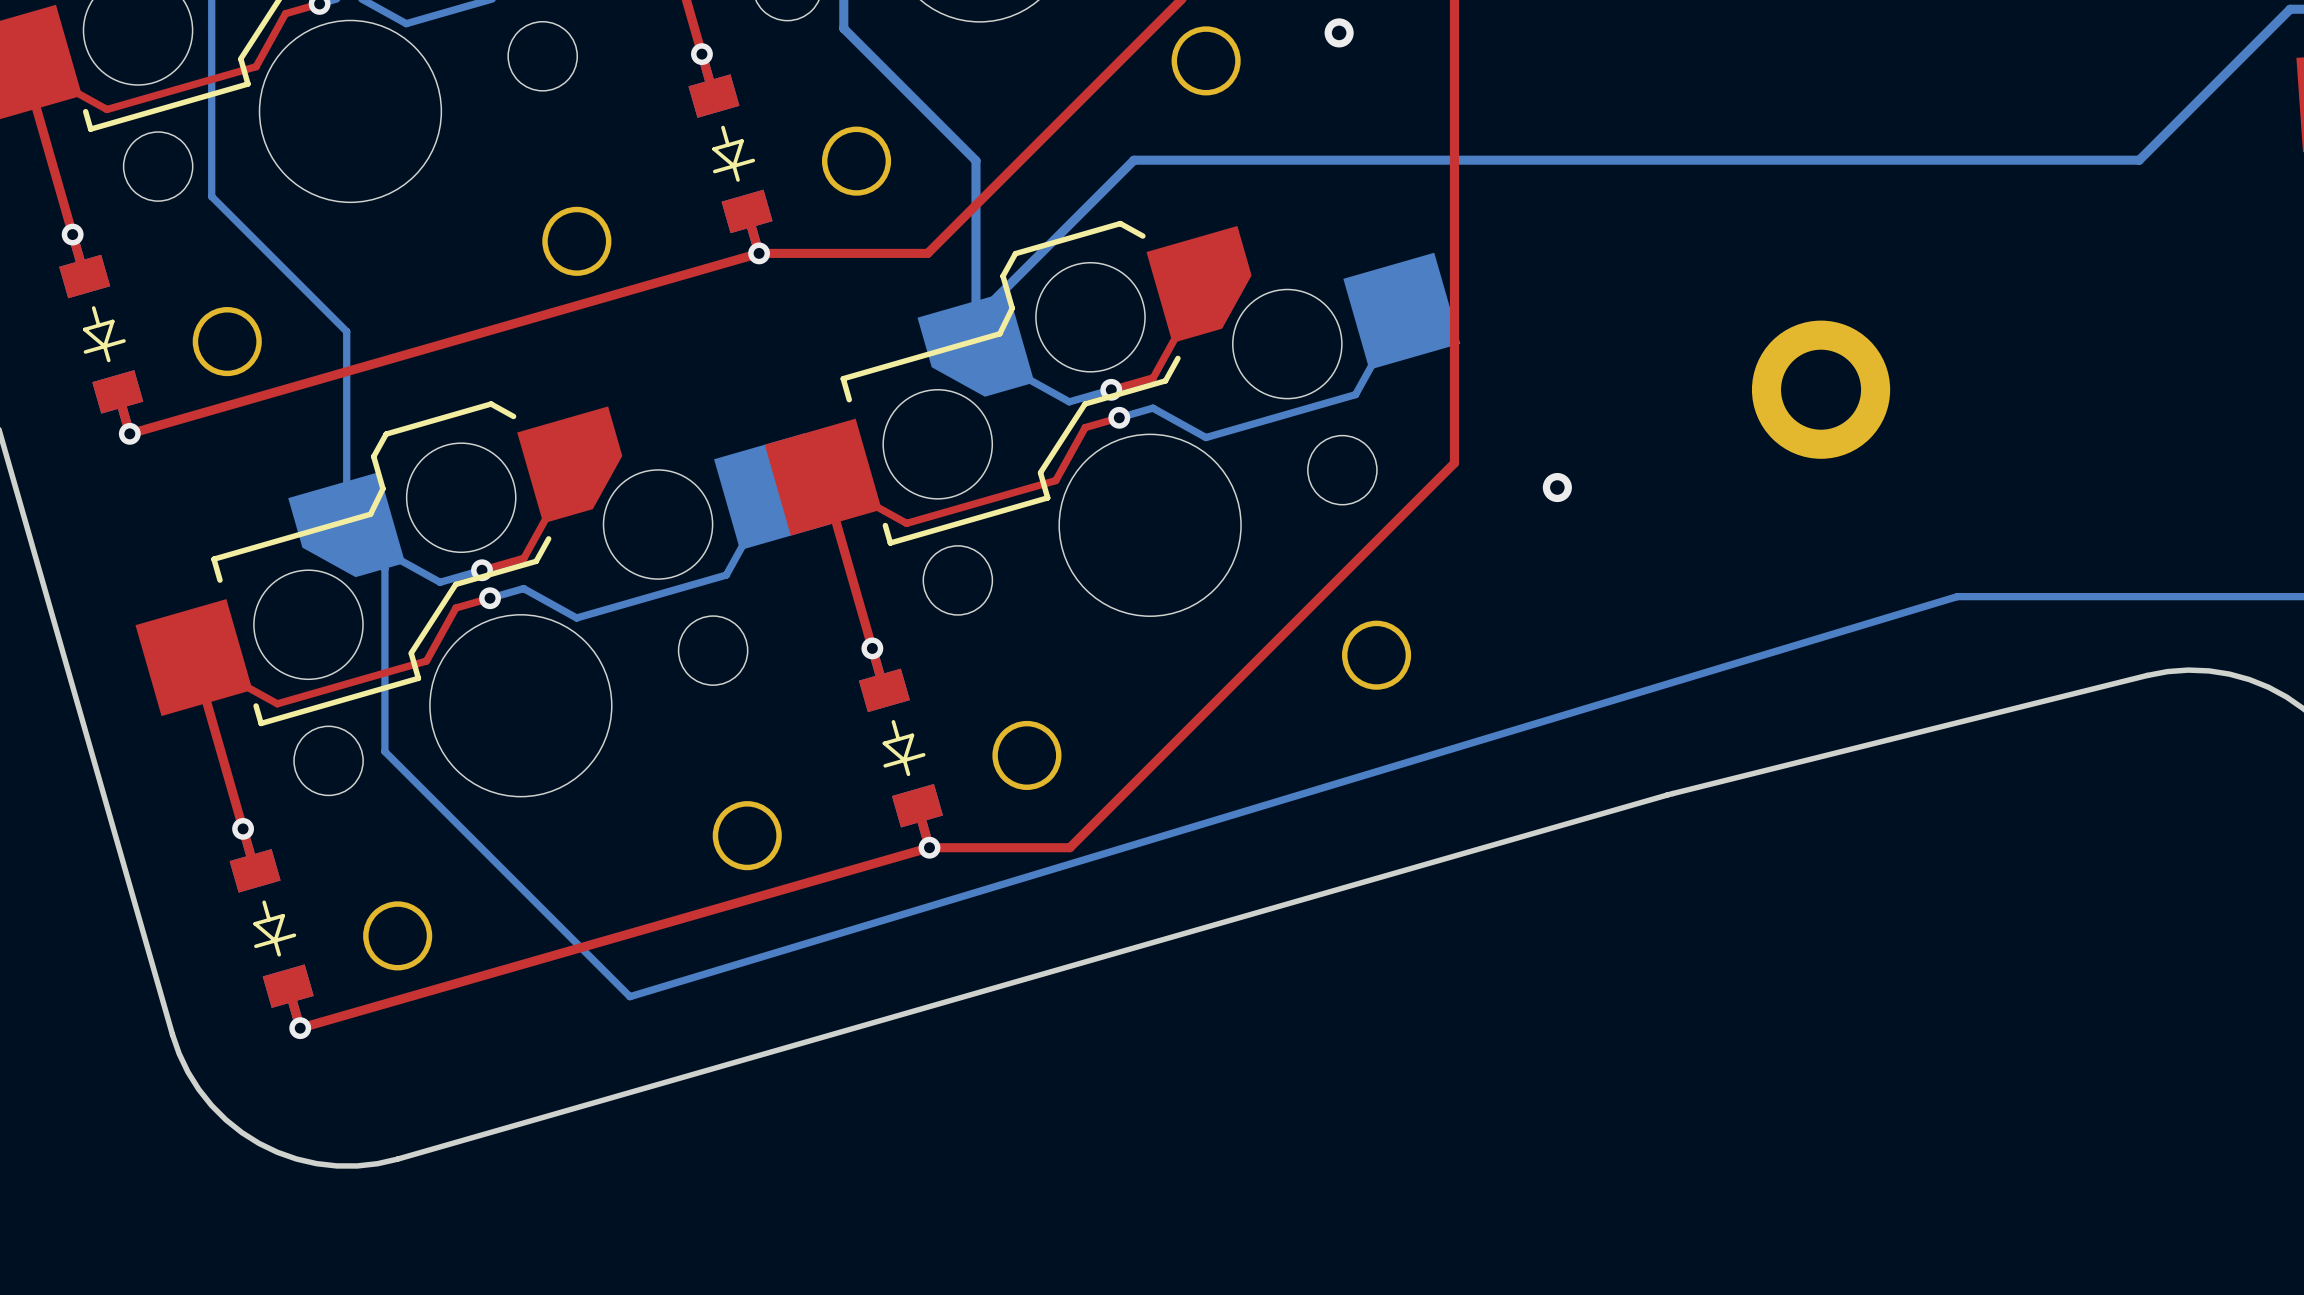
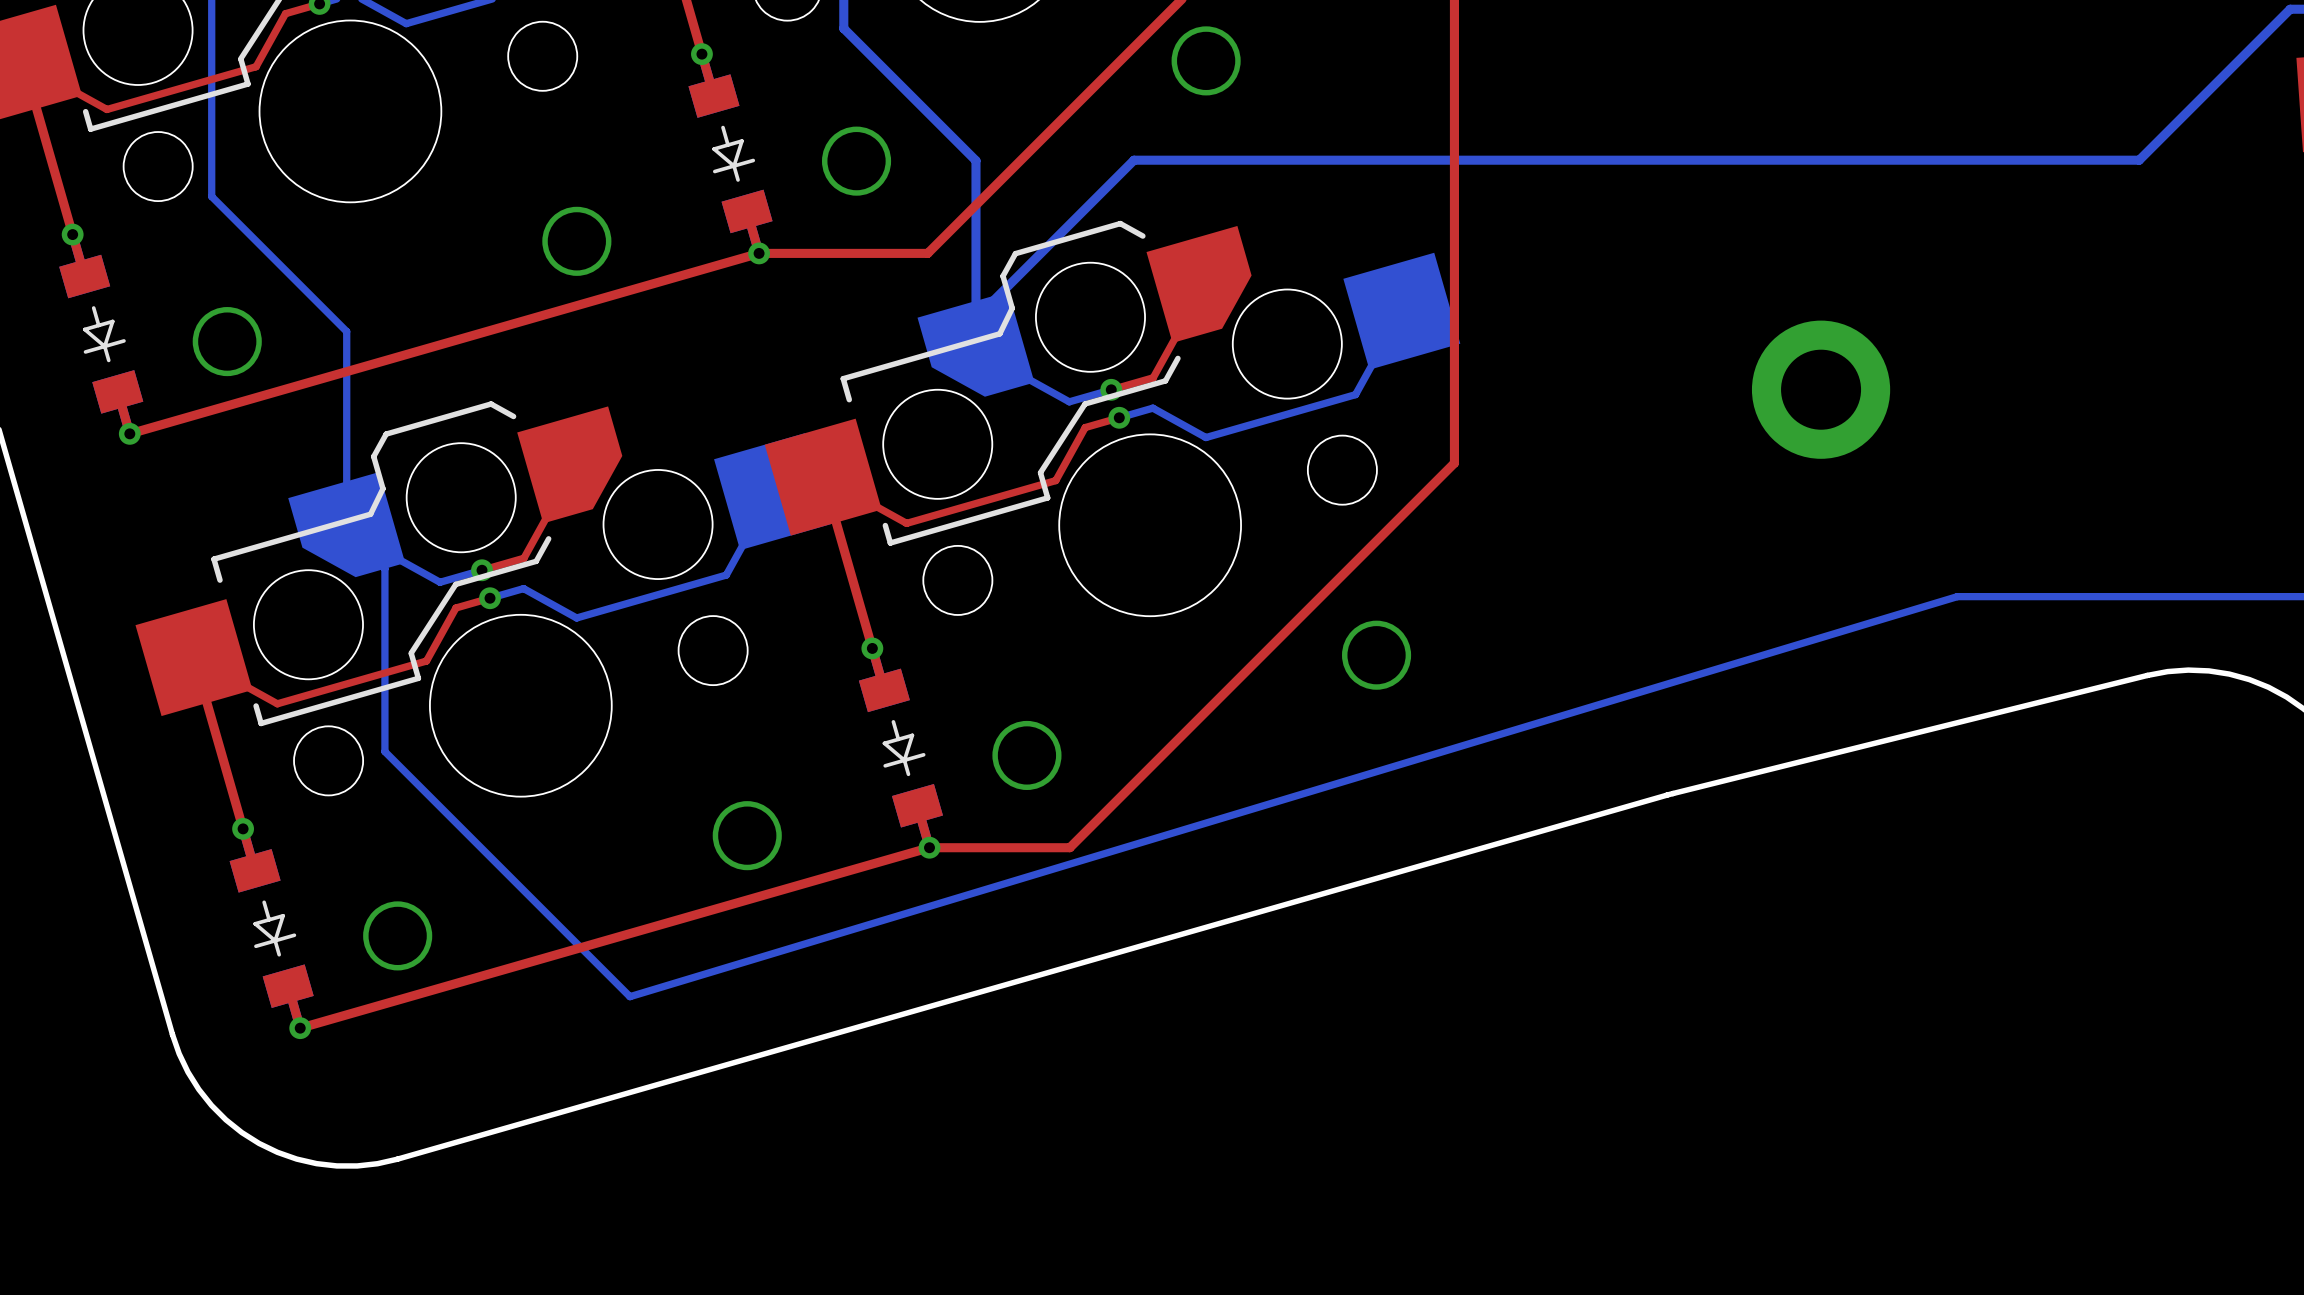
via: (1339, 32) -> none
via: (1557, 487) -> none

